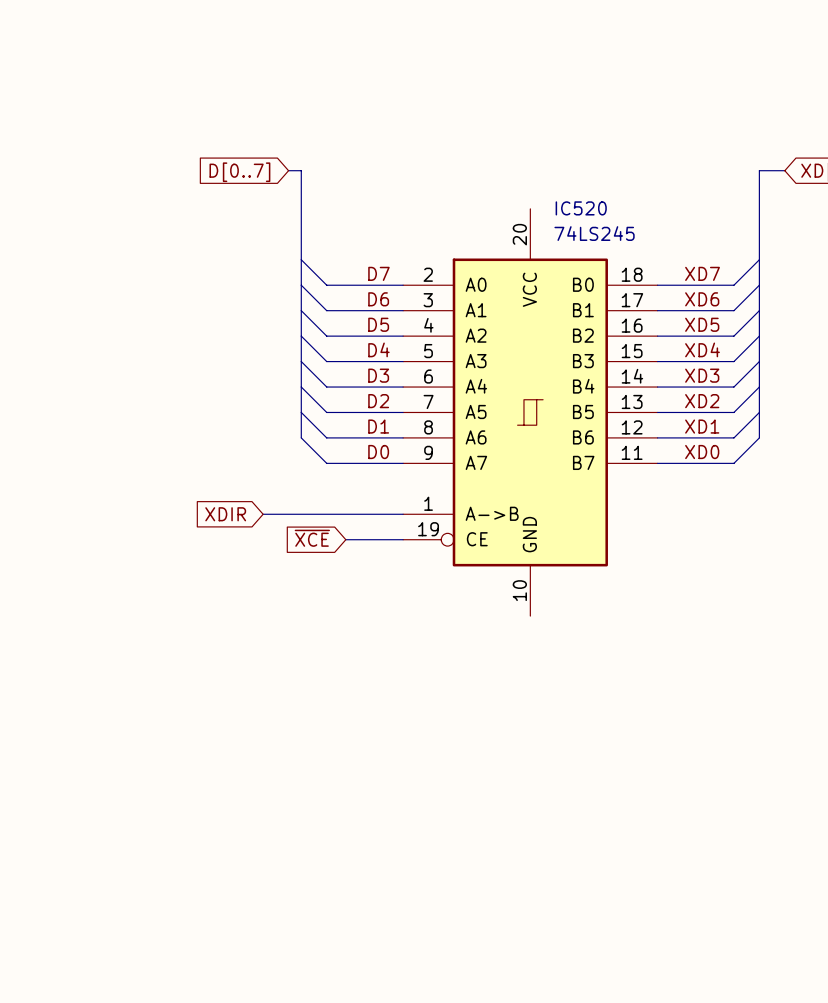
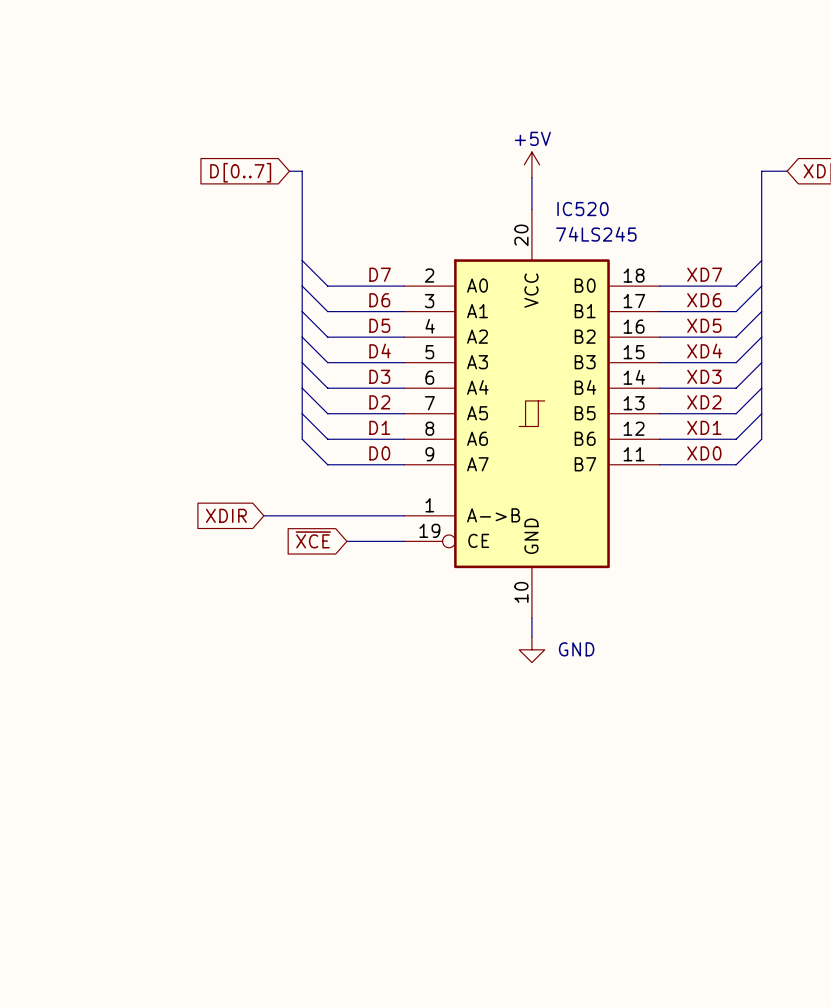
power symbol: none -> +5V (531, 164)
wire: none -> (531, 177) (531, 209)
wire: none -> (531, 617) (531, 637)
power symbol: none -> GND (531, 649)

